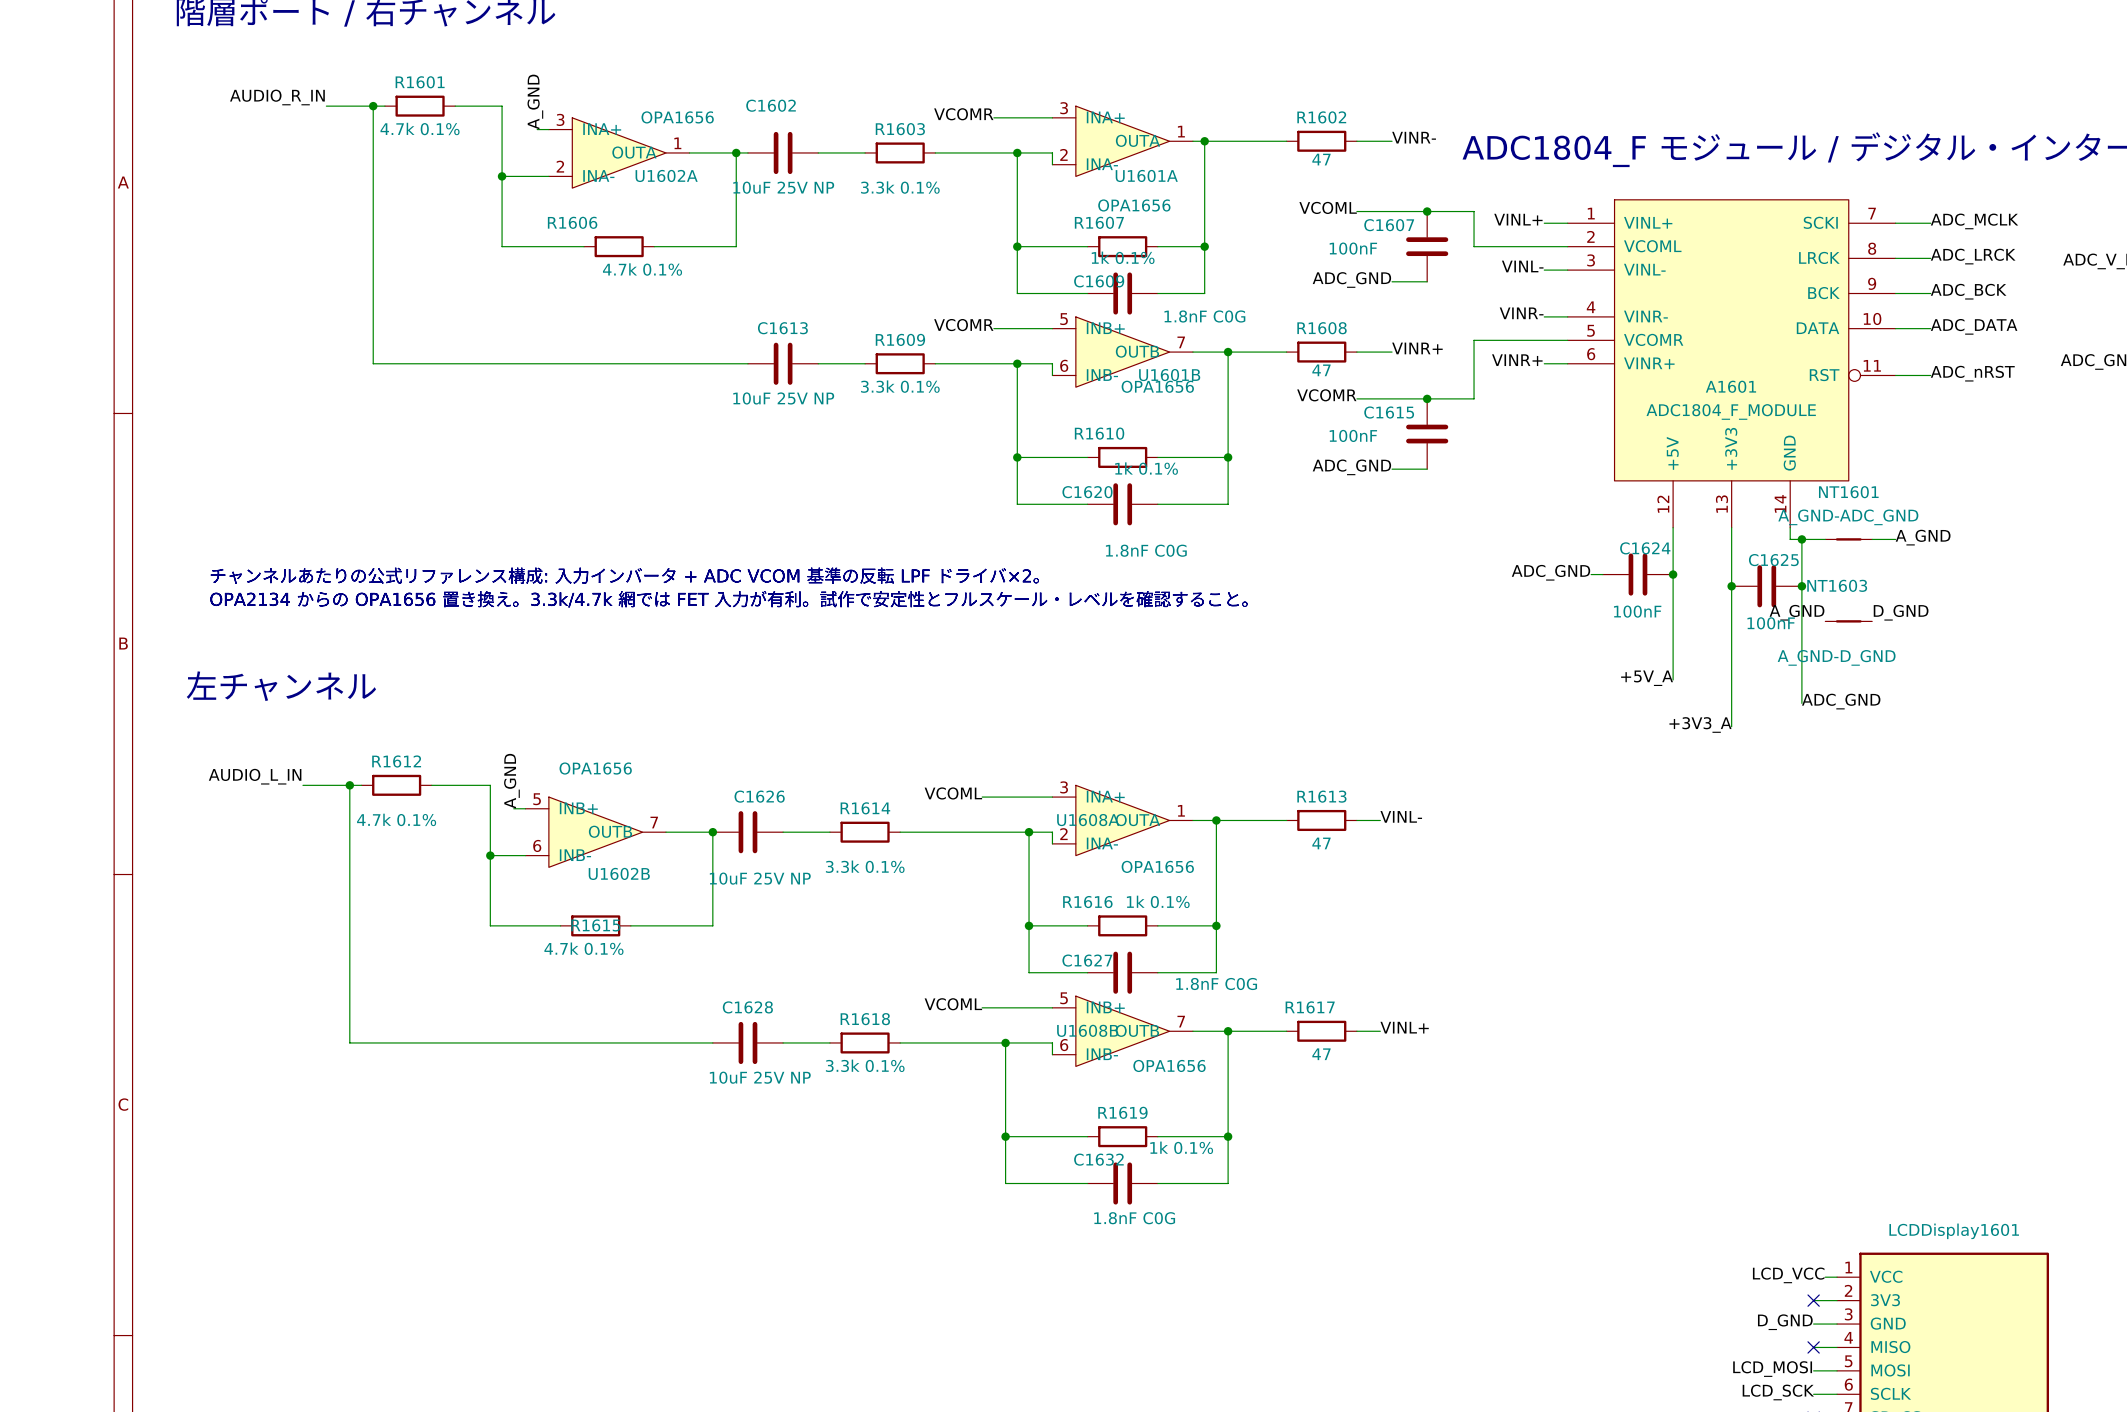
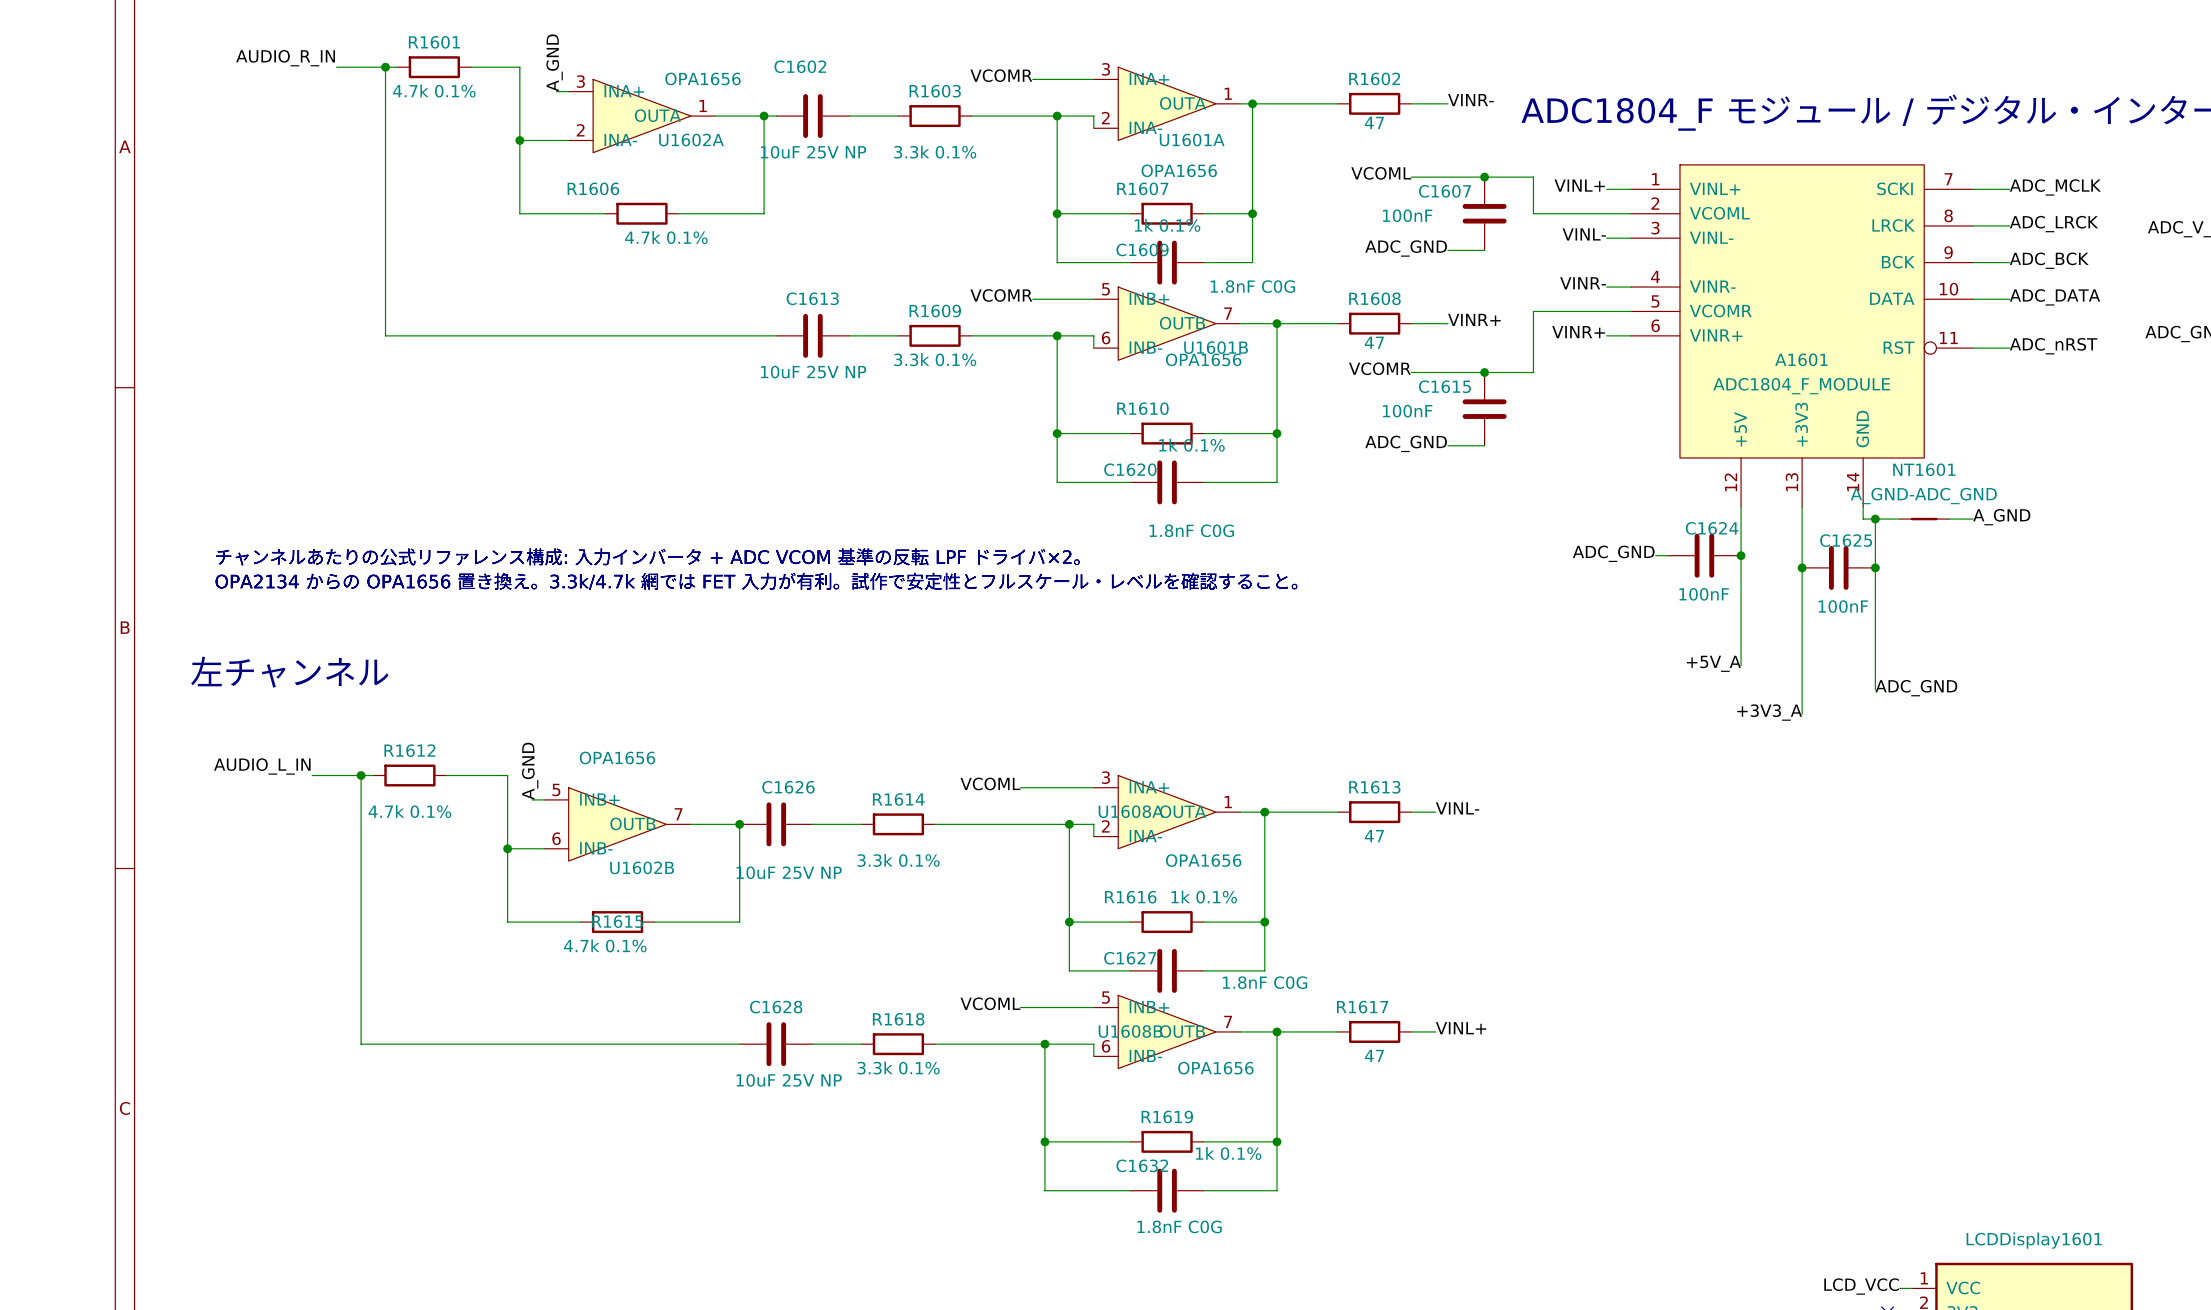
label: A_GND (1797, 612) -> none
label: D_GND (1901, 612) -> none
NT1603: A_GND-D_GND (1848, 621) -> none

